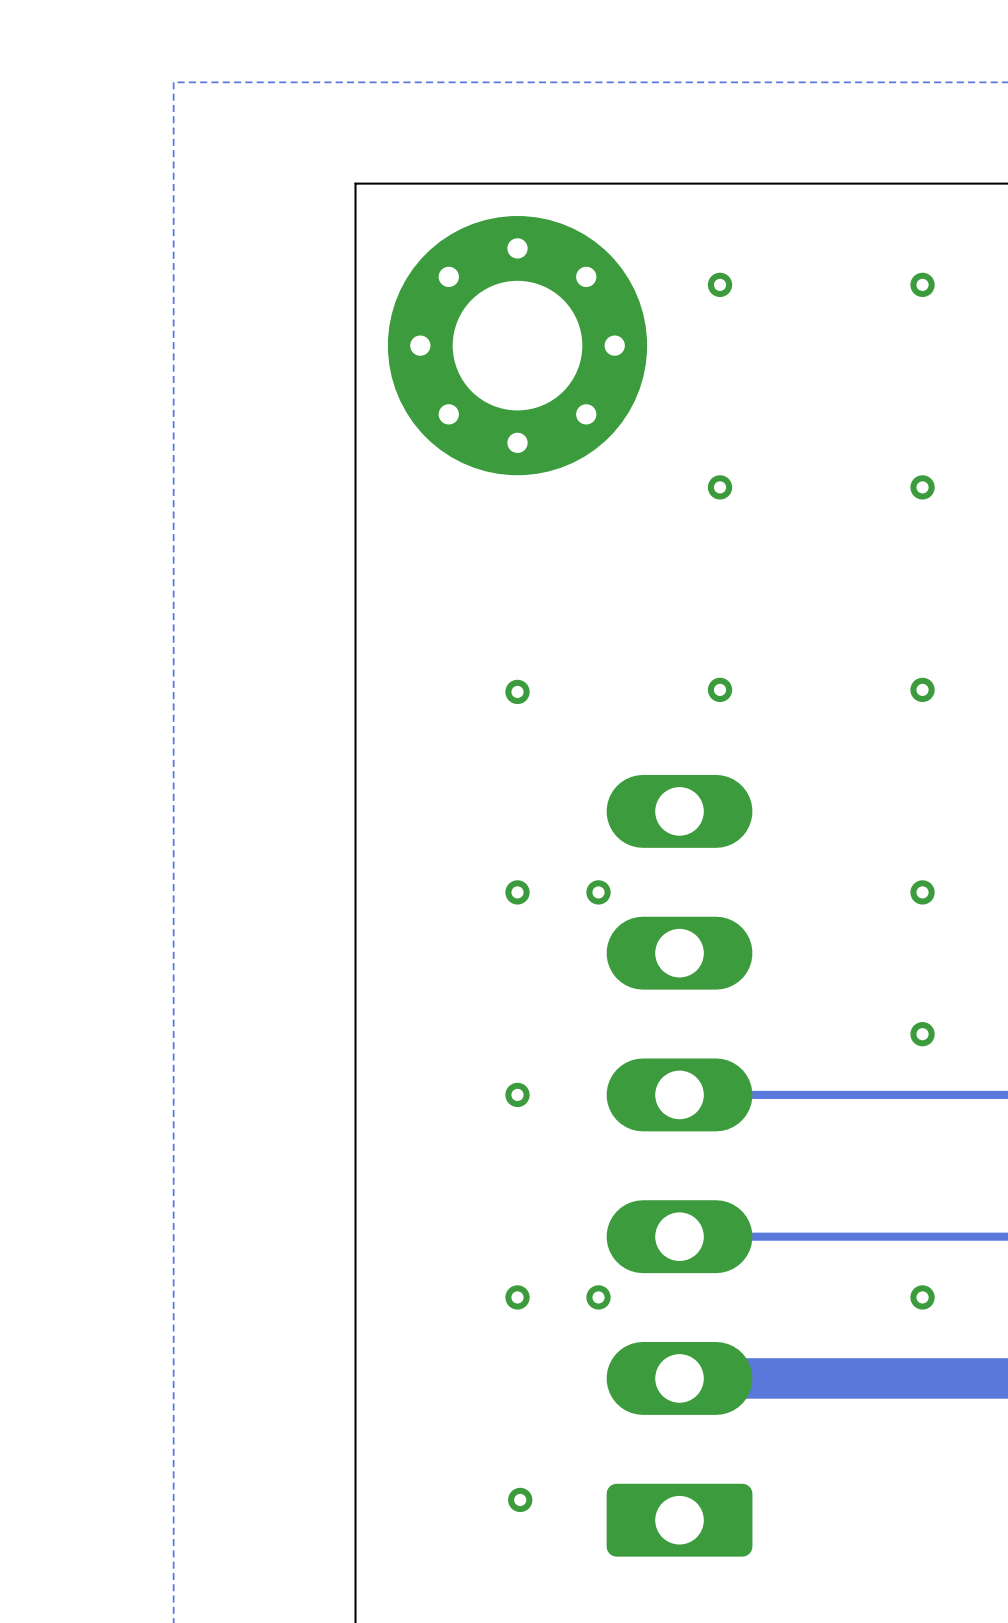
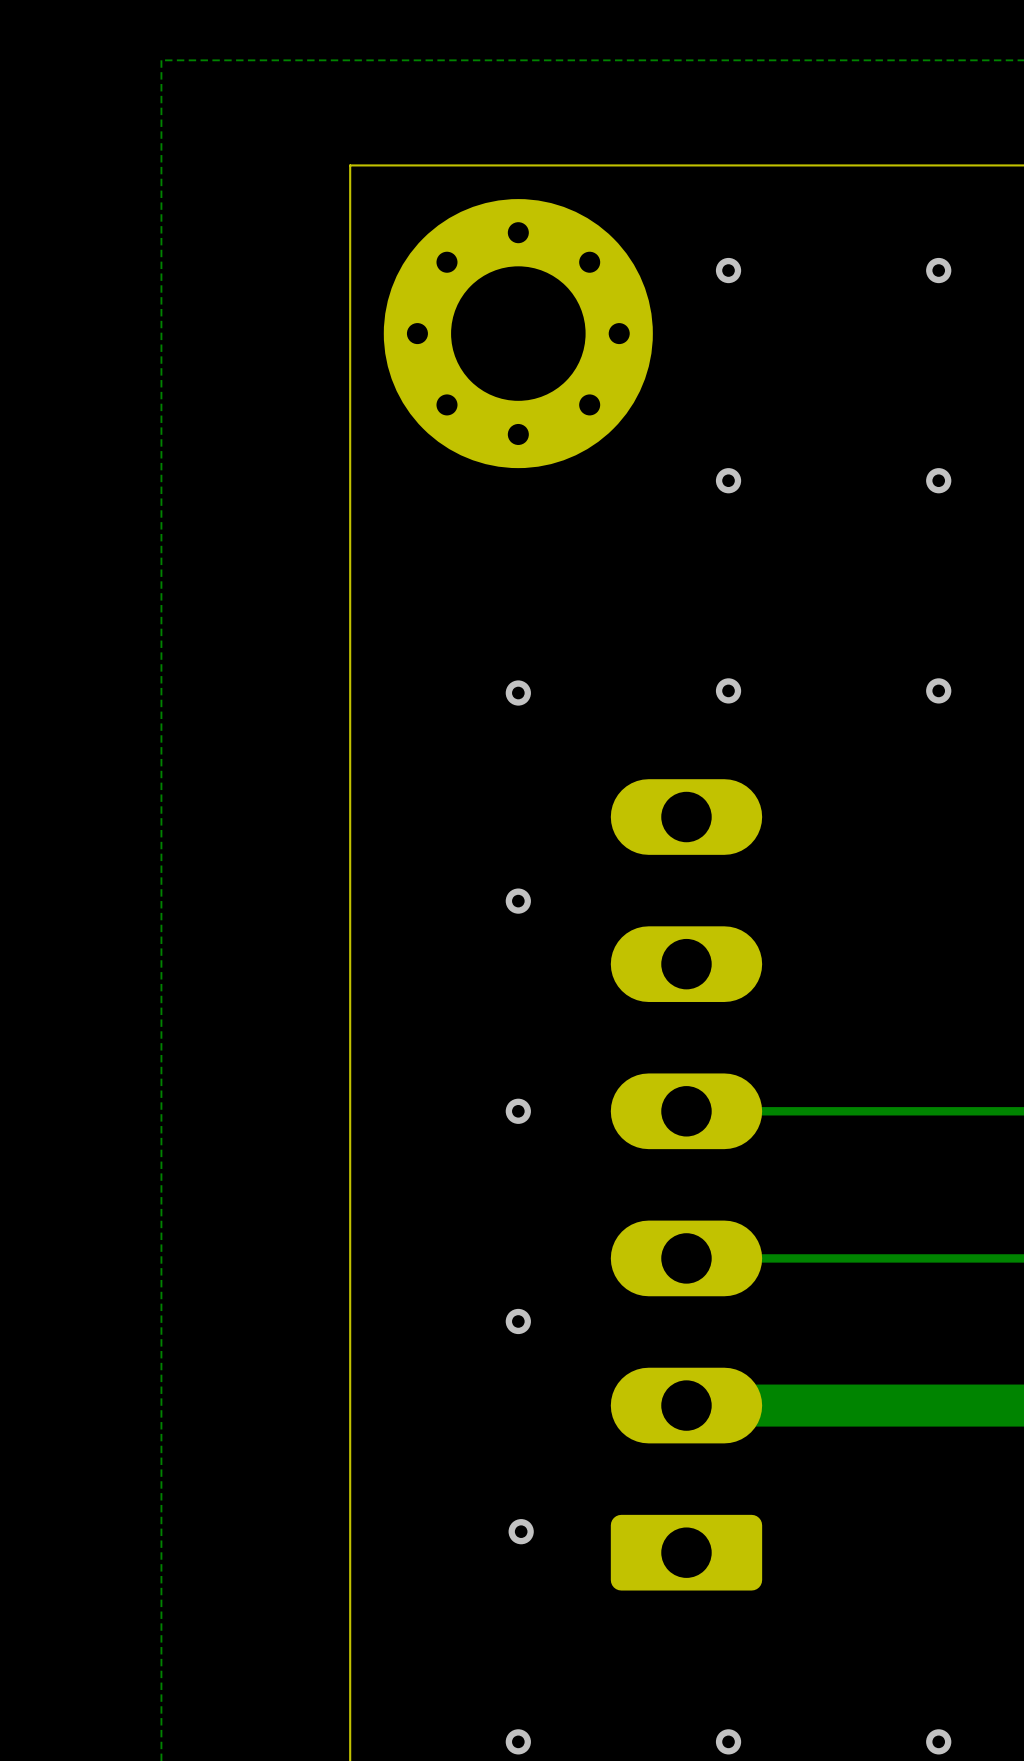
via: (598, 892) -> none
via: (922, 892) -> none
via: (922, 1034) -> none
via: (598, 1297) -> none
via: (922, 1297) -> none

